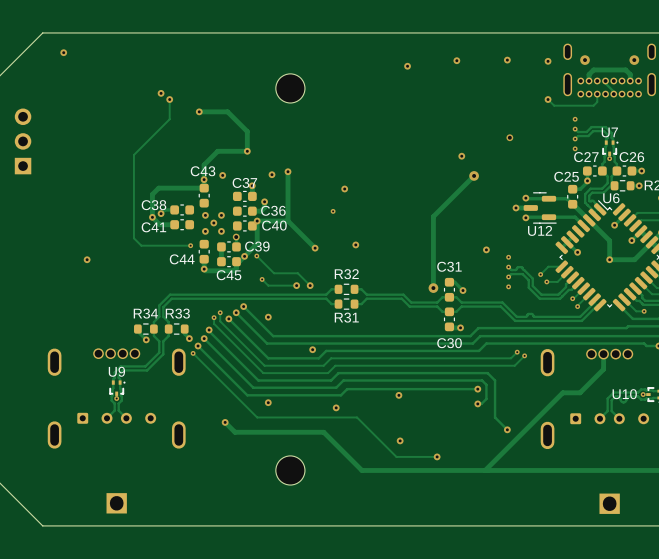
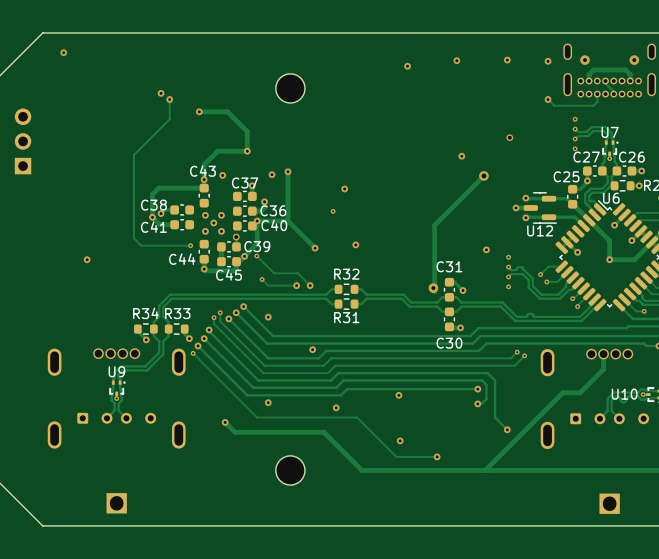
track: (474, 175) (433, 216) (433, 288) -> none
via: (474, 175) -> none
track: none -> (483, 175) (434, 225) (434, 291)
via: none -> (483, 175)

